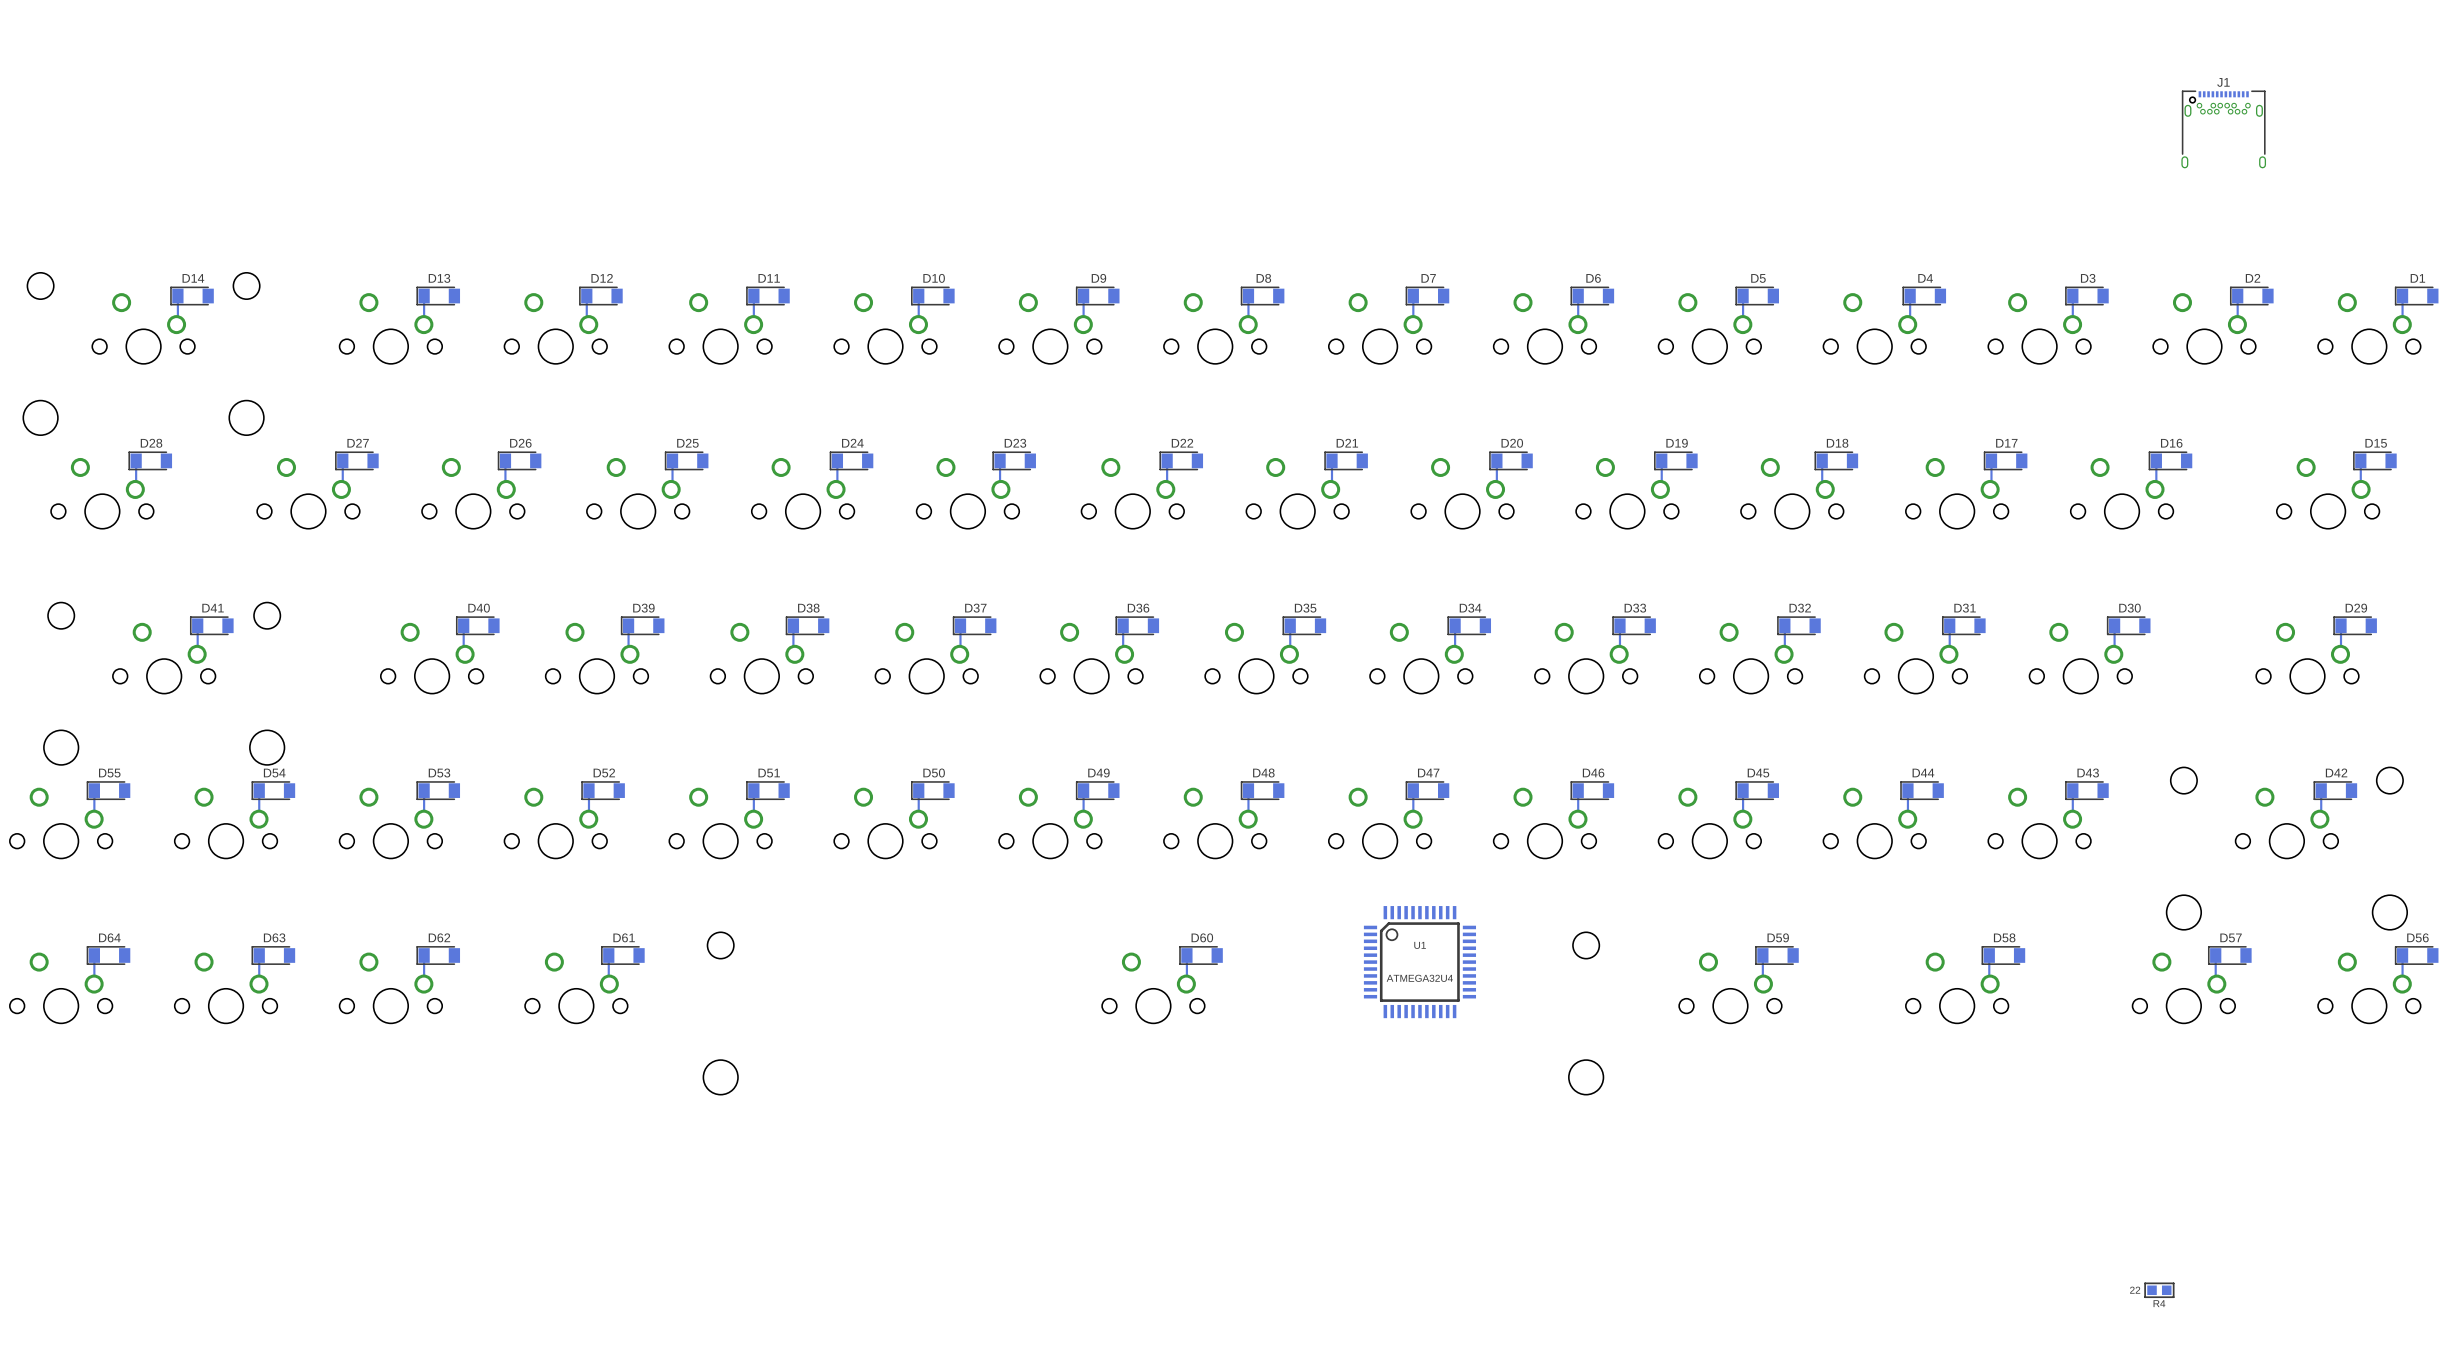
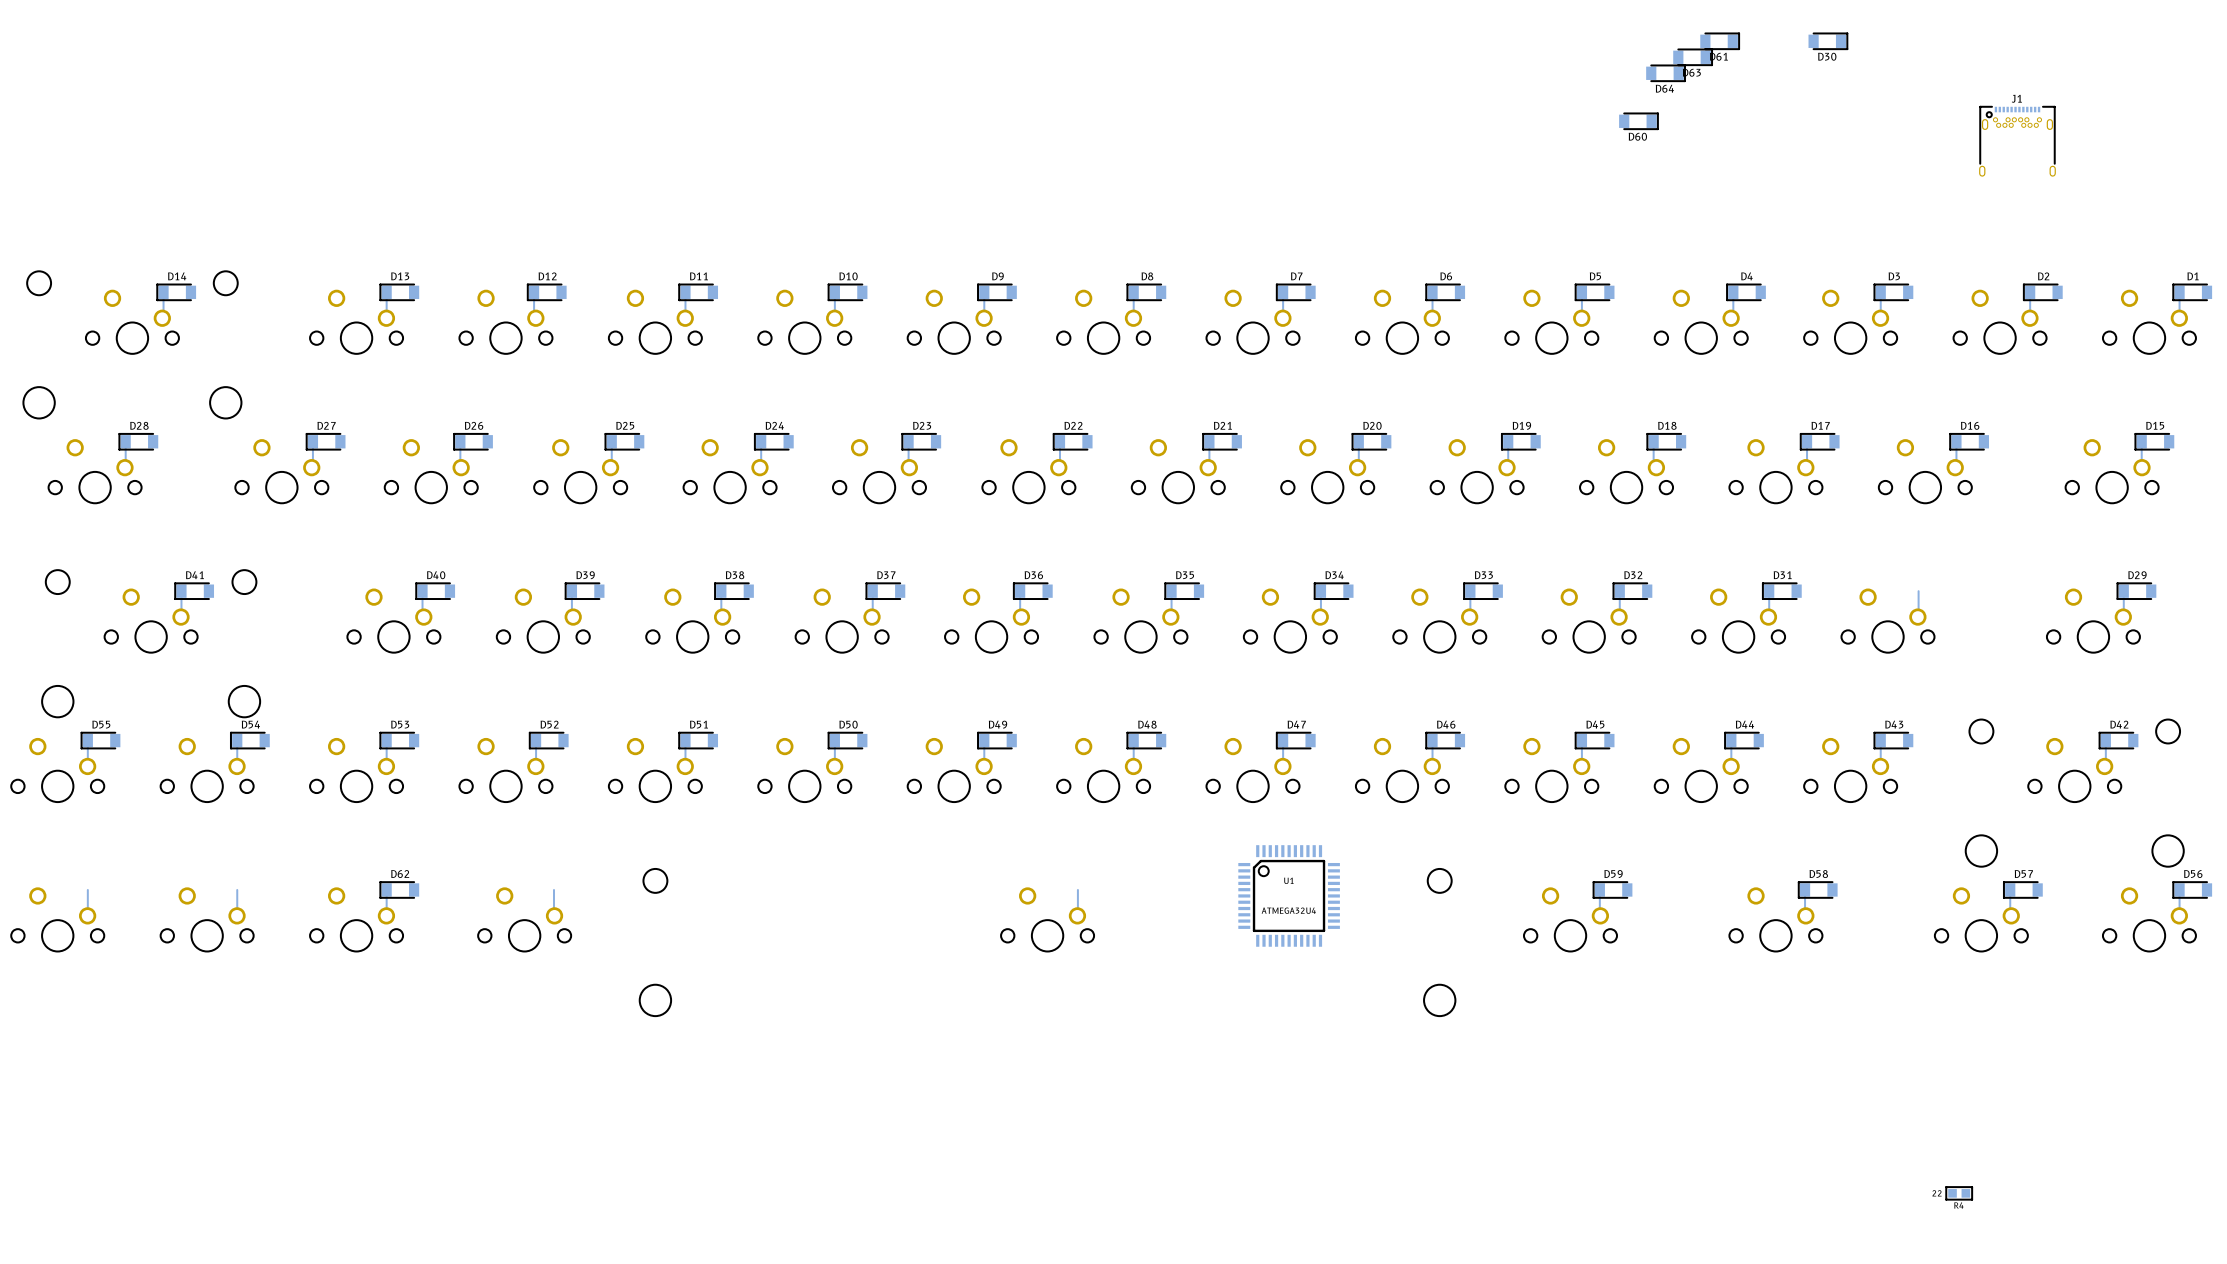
D30 rotation: 0° (2128, 625) -> 180° (1828, 41)
D30 position: (2128, 625) -> (1828, 41)
D64 rotation: 0° (108, 955) -> 180° (1665, 73)
D64 position: (108, 955) -> (1665, 73)
D63 rotation: 0° (273, 955) -> 180° (1692, 57)
D63 position: (273, 955) -> (1692, 57)
D61 rotation: 0° (623, 955) -> 180° (1719, 41)
D61 position: (623, 955) -> (1719, 41)
D60 rotation: 0° (1201, 955) -> 180° (1638, 121)
D60 position: (1201, 955) -> (1638, 121)

